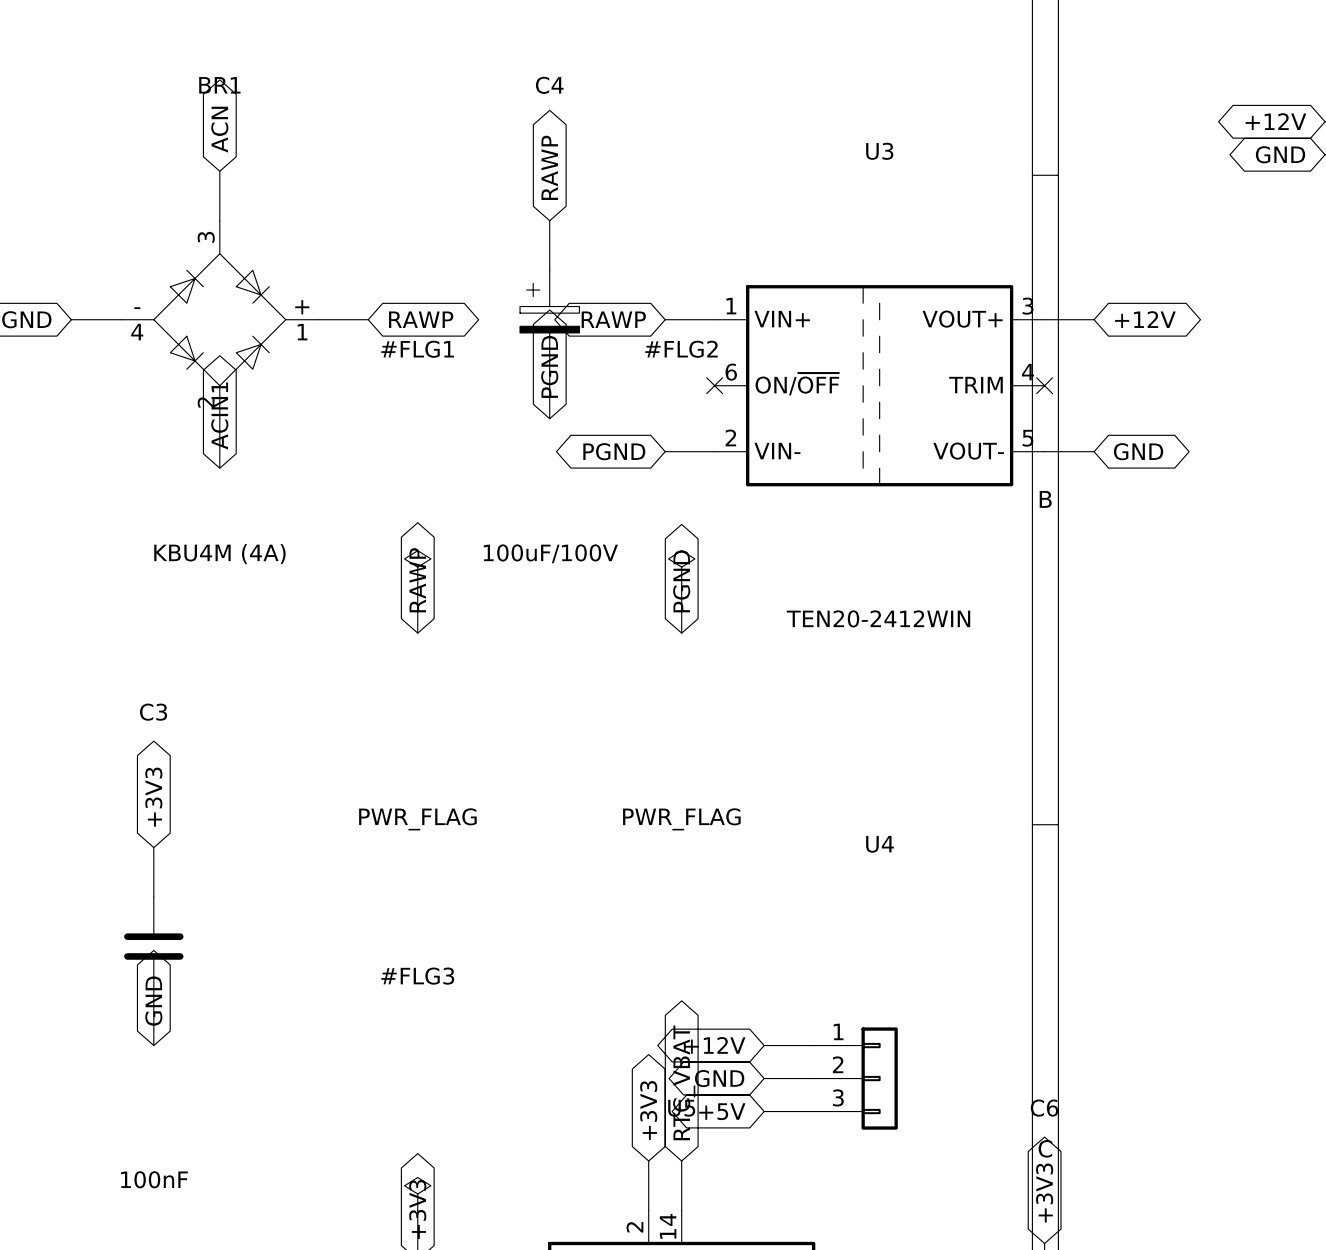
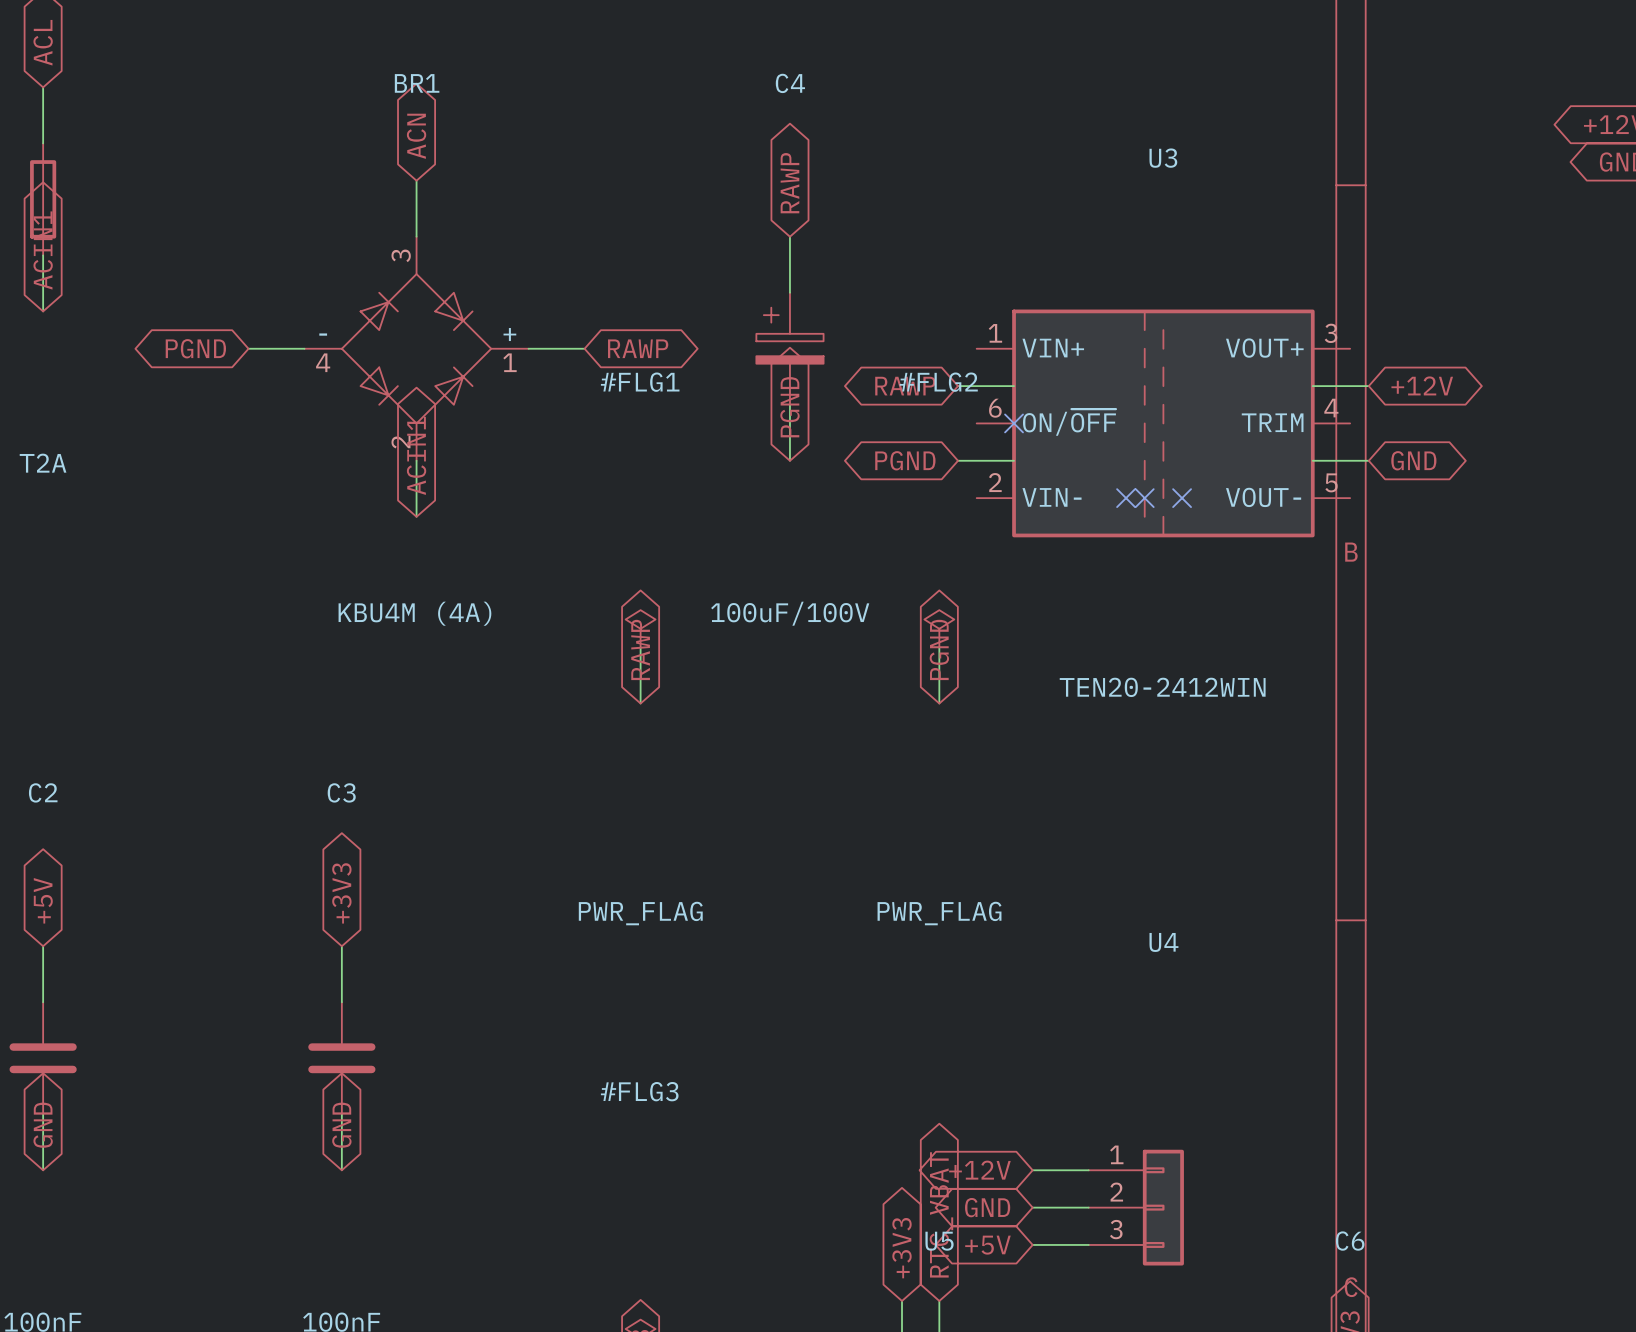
global label position: RAWP (613, 319) -> RAWP (905, 386)
wire: (665, 319) (714, 319) -> (958, 386) (1014, 386)
wire: (1044, 319) (1094, 319) -> (1312, 386) (1368, 386)
global label position: +12V (1145, 319) -> +12V (1422, 385)
no-connect mark position: (714, 385) -> (1014, 423)
no-connect mark: (1044, 385) -> none
global label position: PGND (614, 451) -> PGND (905, 460)
wire: (665, 451) (714, 451) -> (958, 460) (1014, 460)
no-connect mark: none -> (1126, 498)
no-connect mark: none -> (1144, 498)
no-connect mark: none -> (1182, 498)
wire: (1044, 451) (1094, 451) -> (1312, 460) (1368, 460)
global label position: GND (1138, 451) -> GND (1413, 460)

